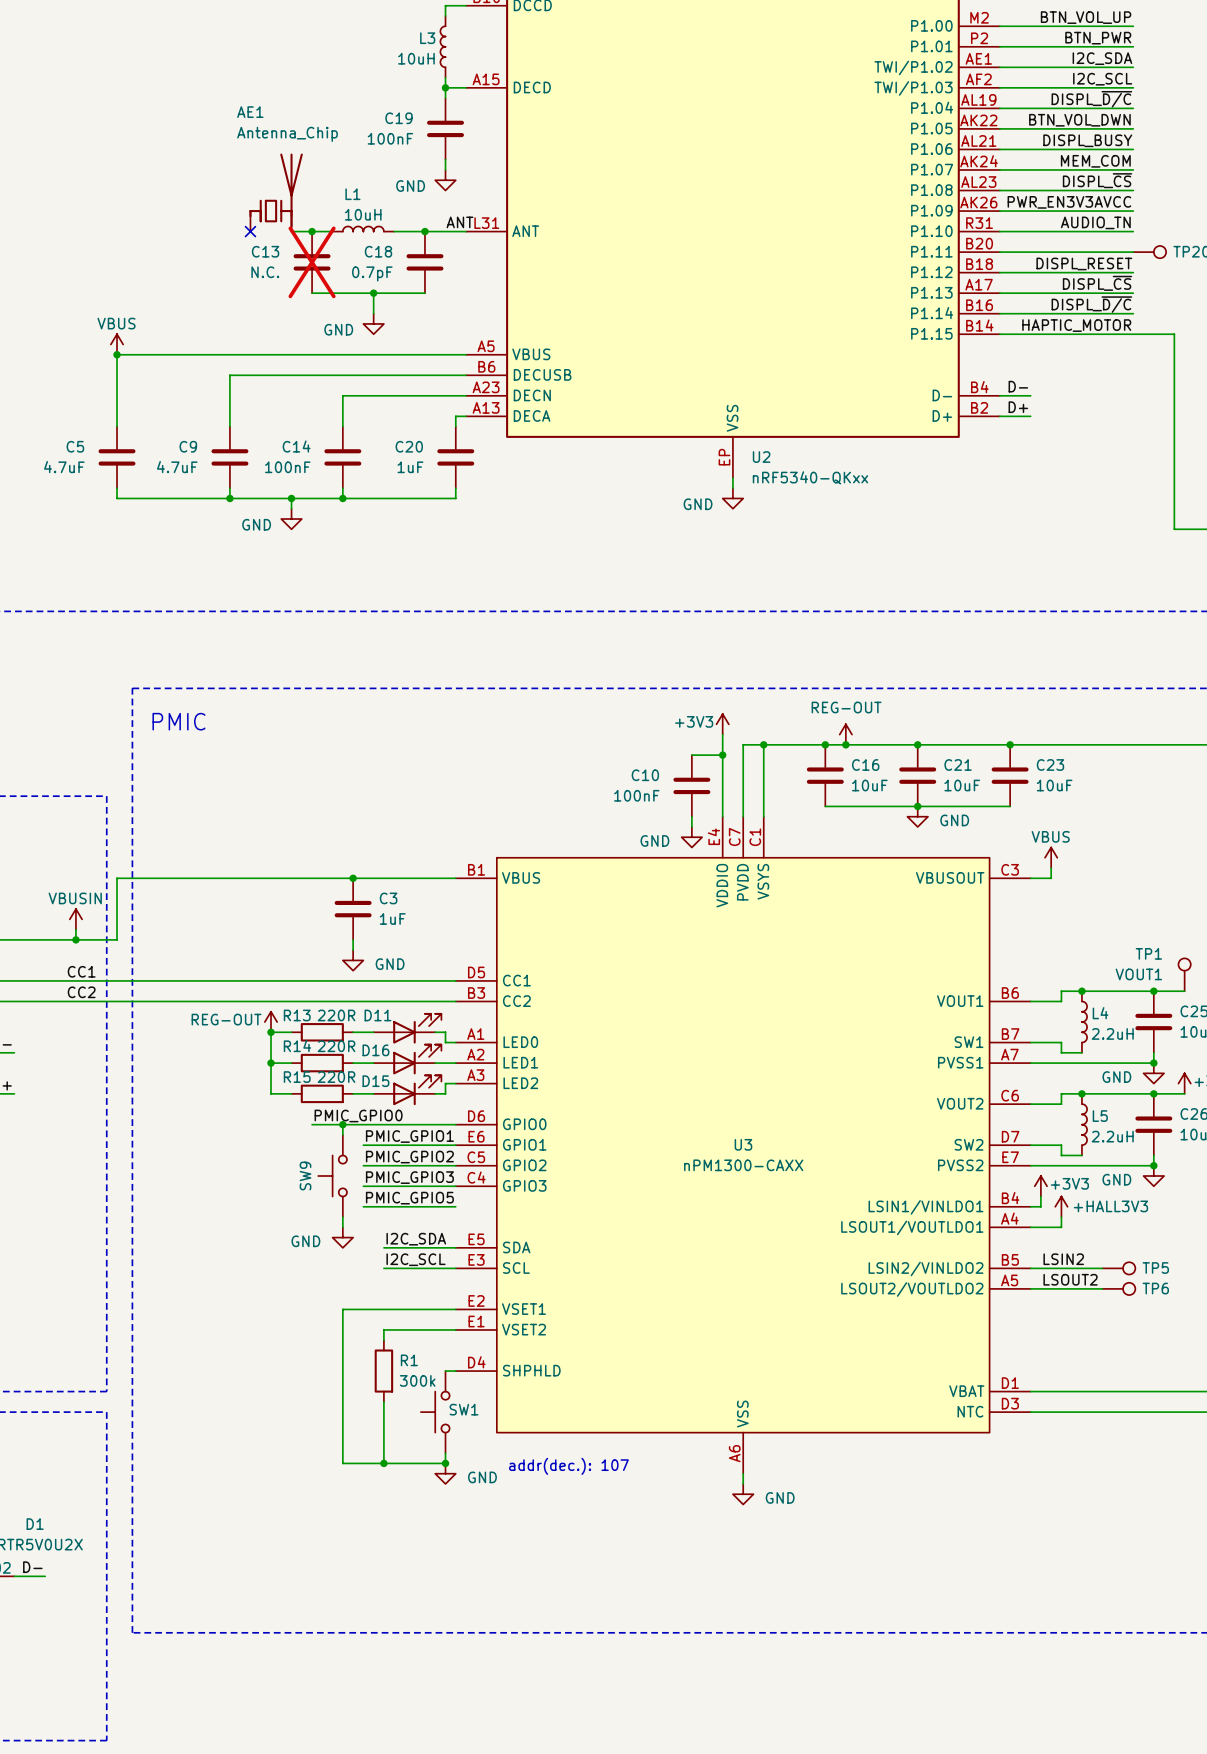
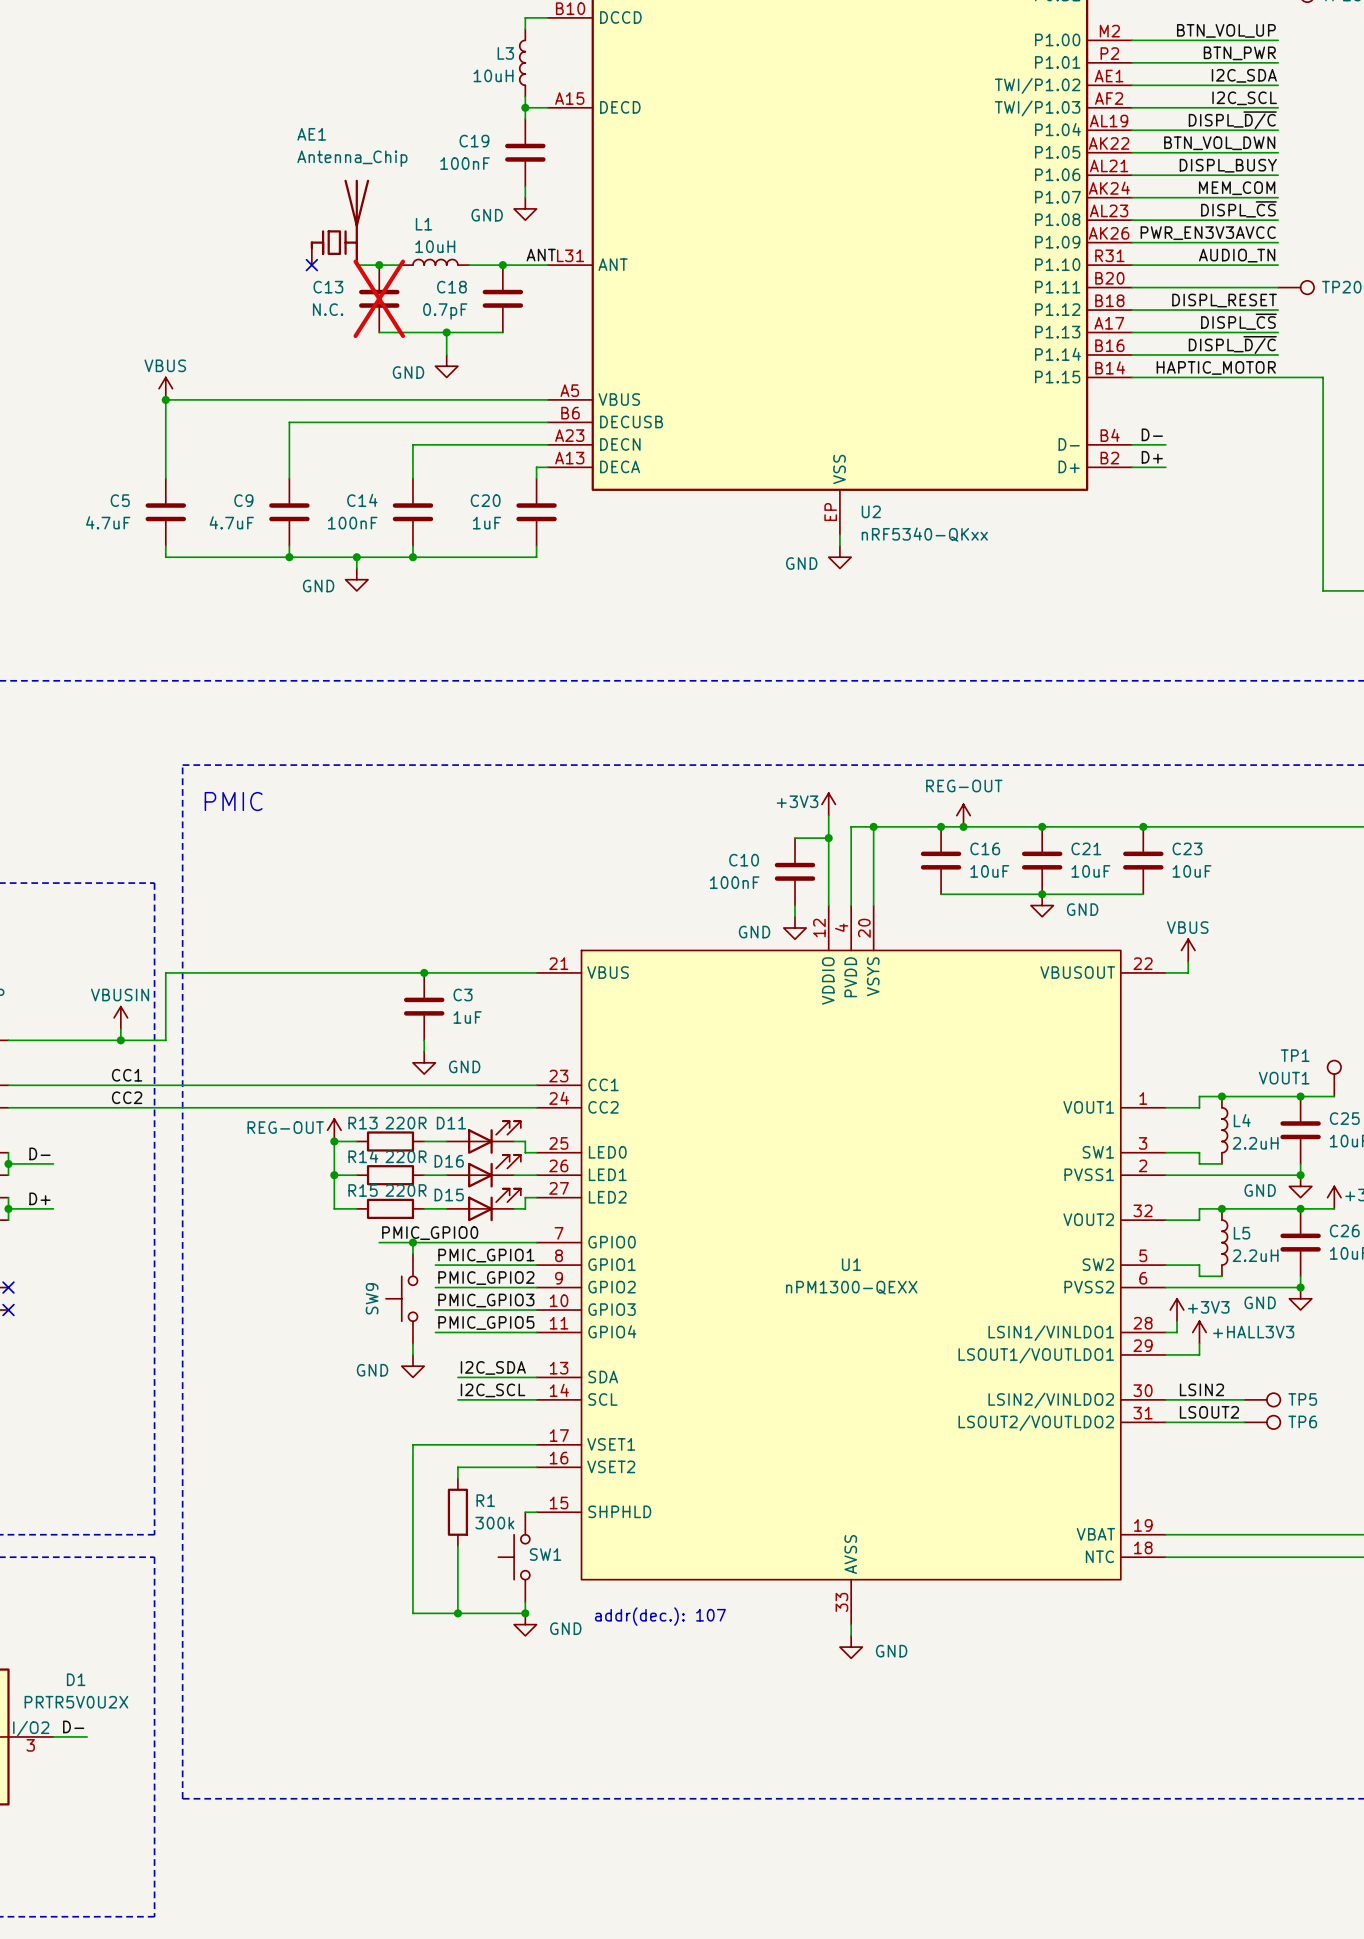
U3: nPM1300-CAXX (743, 1145) -> none
U1: none -> nPM1300-QEXX (851, 1265)

